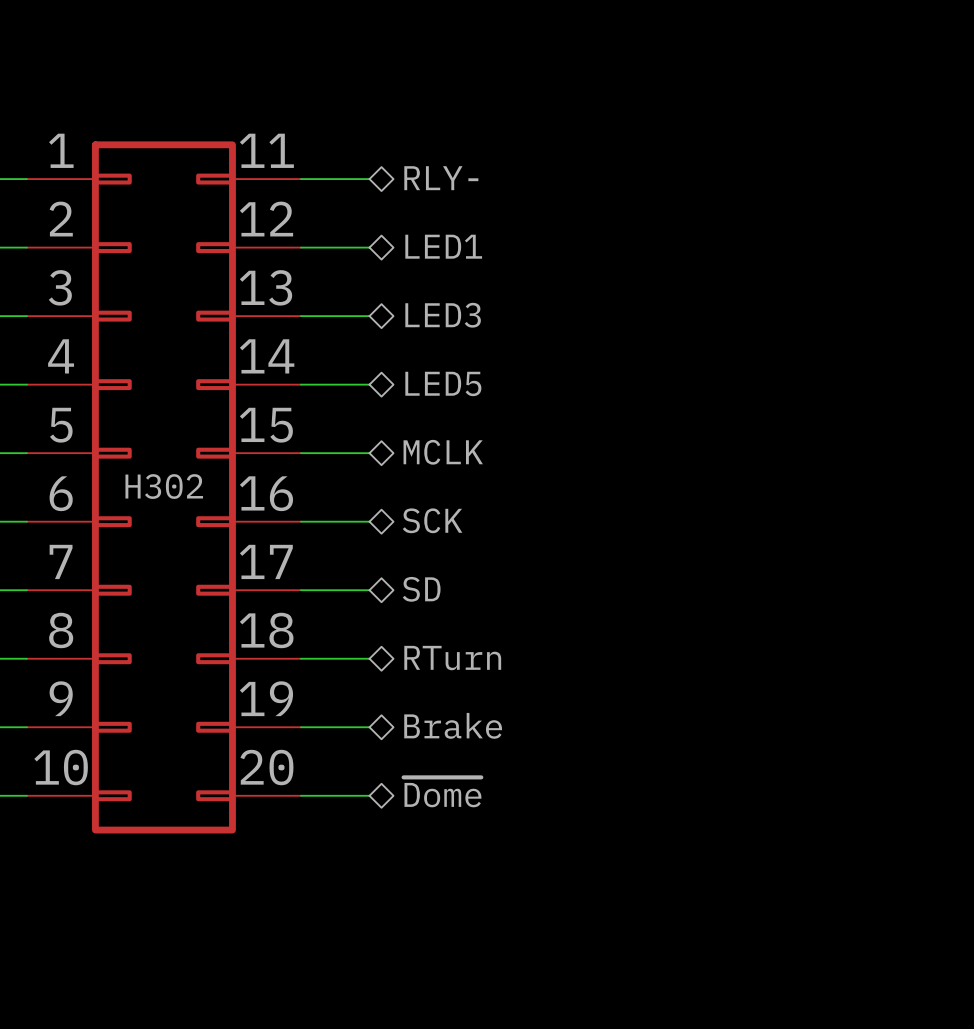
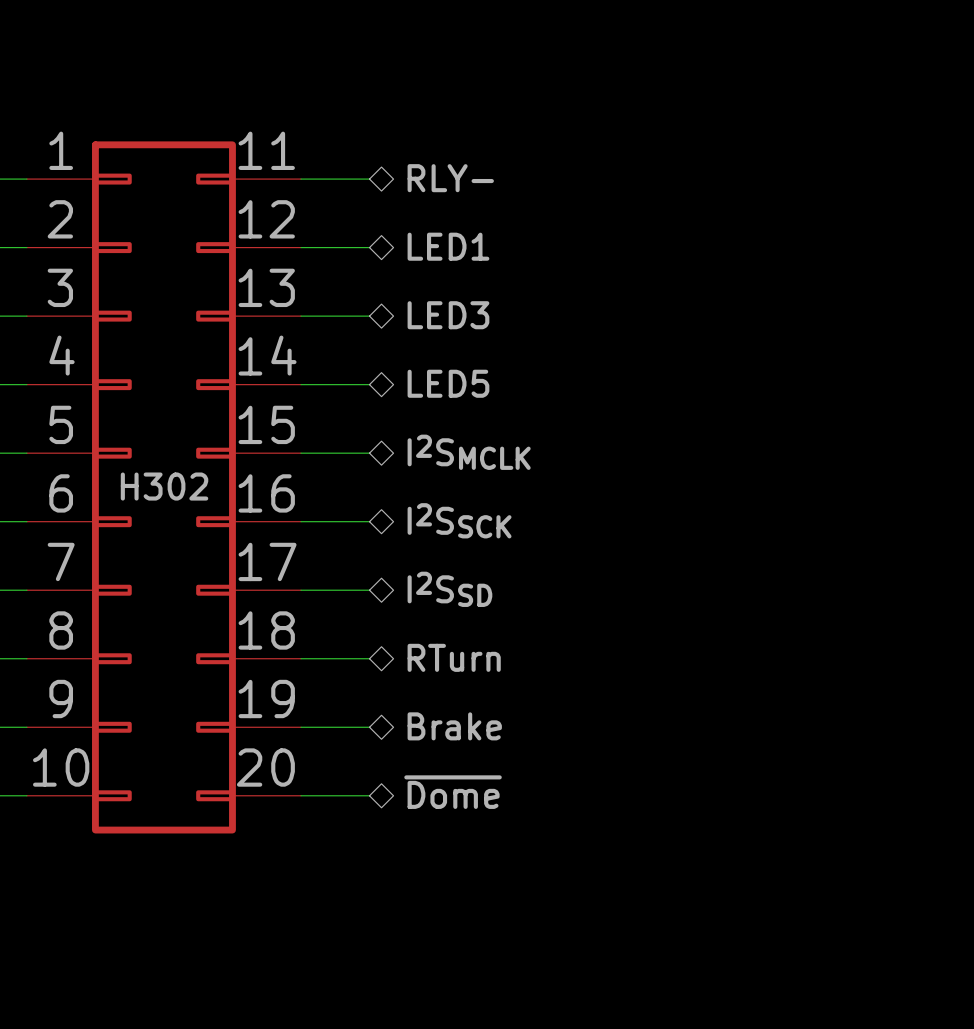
hierarchical label: MCLK (443, 452) -> I2SMCLK (469, 452)
hierarchical label: SCK (432, 520) -> I2SSCK (459, 520)
hierarchical label: SD (421, 589) -> I2SSD (449, 589)

